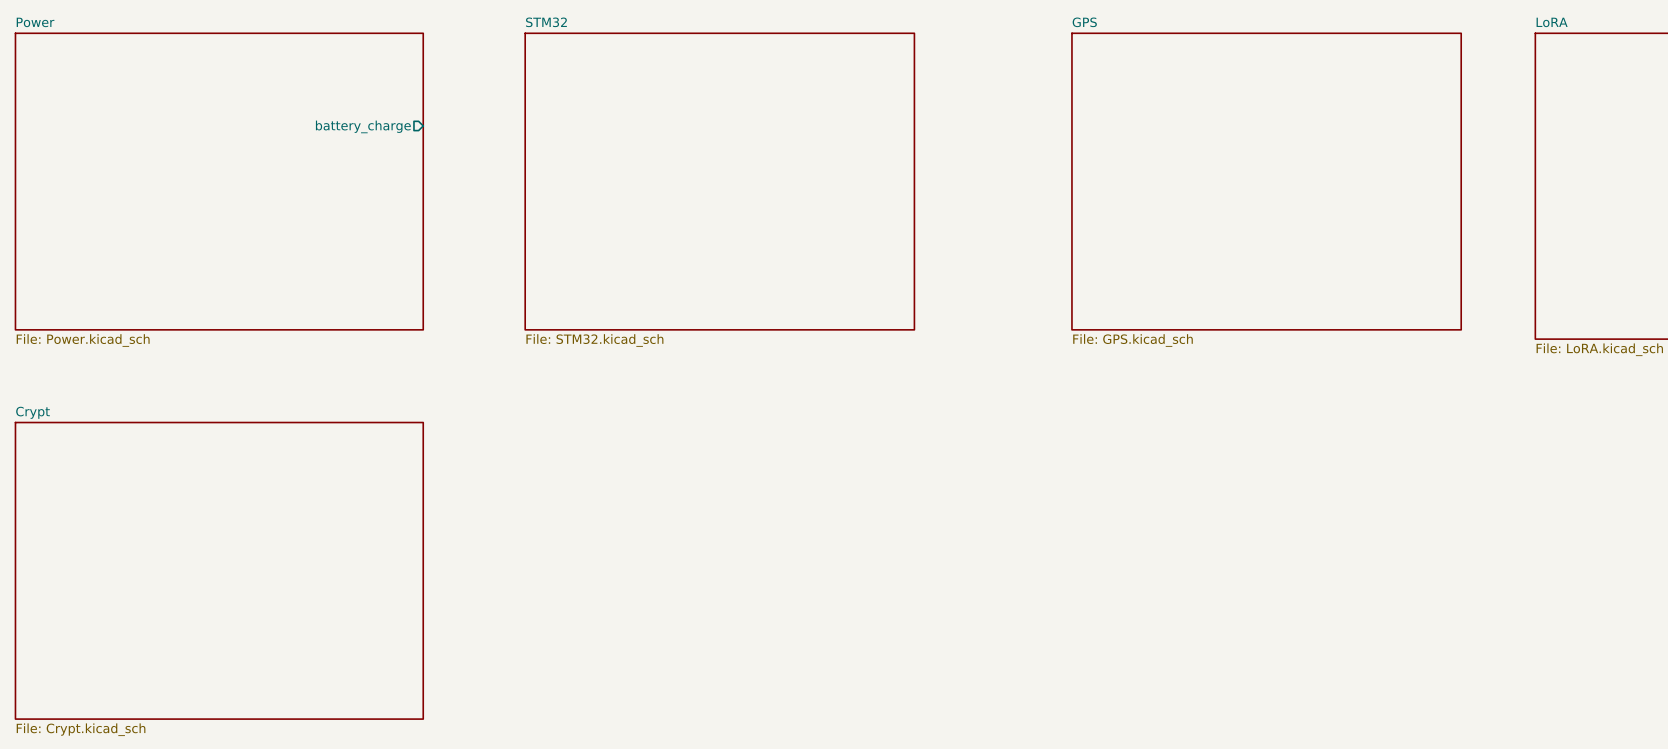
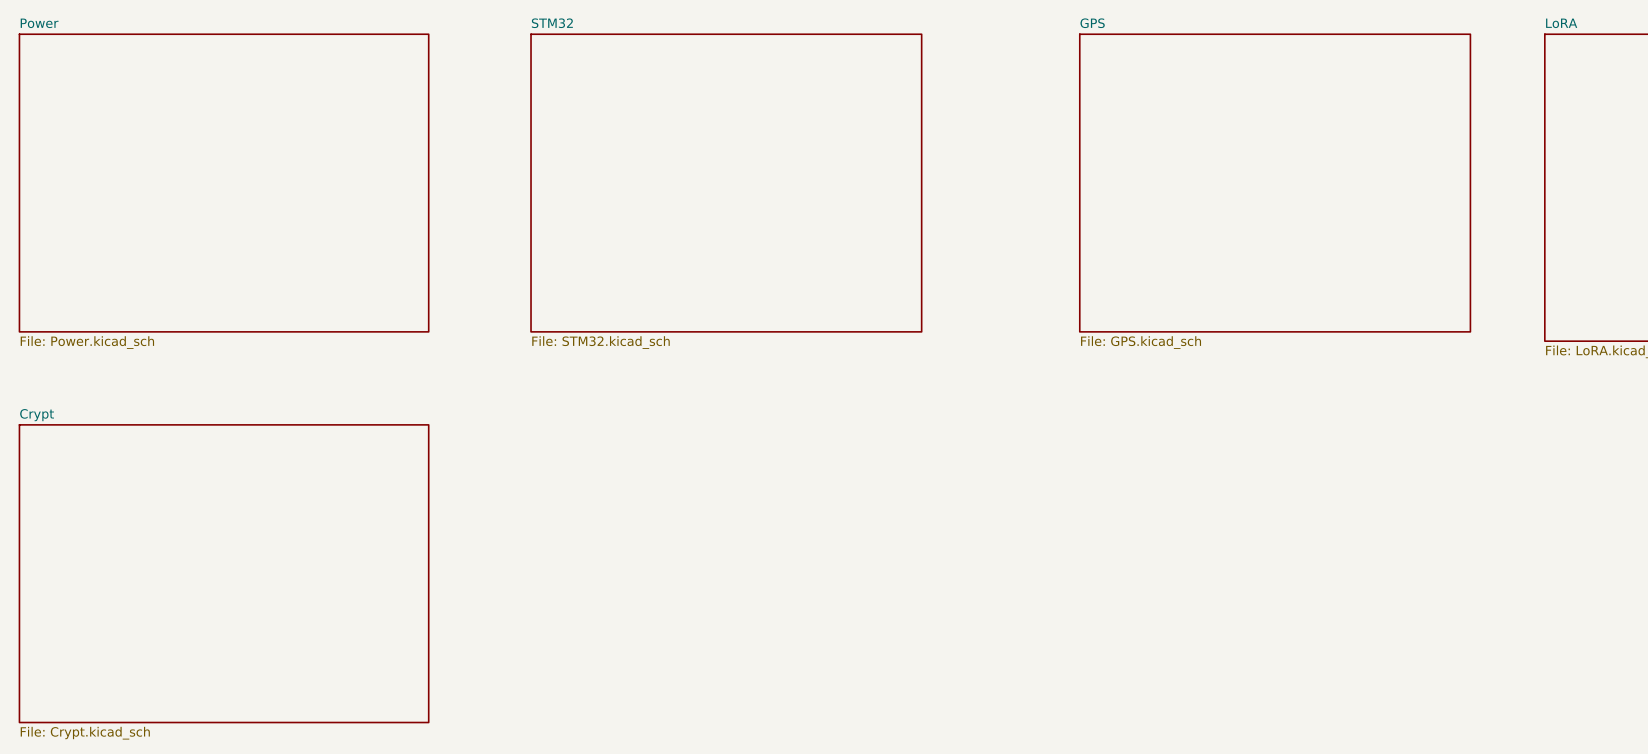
sheet pin: battery_charge (363, 126) -> none

